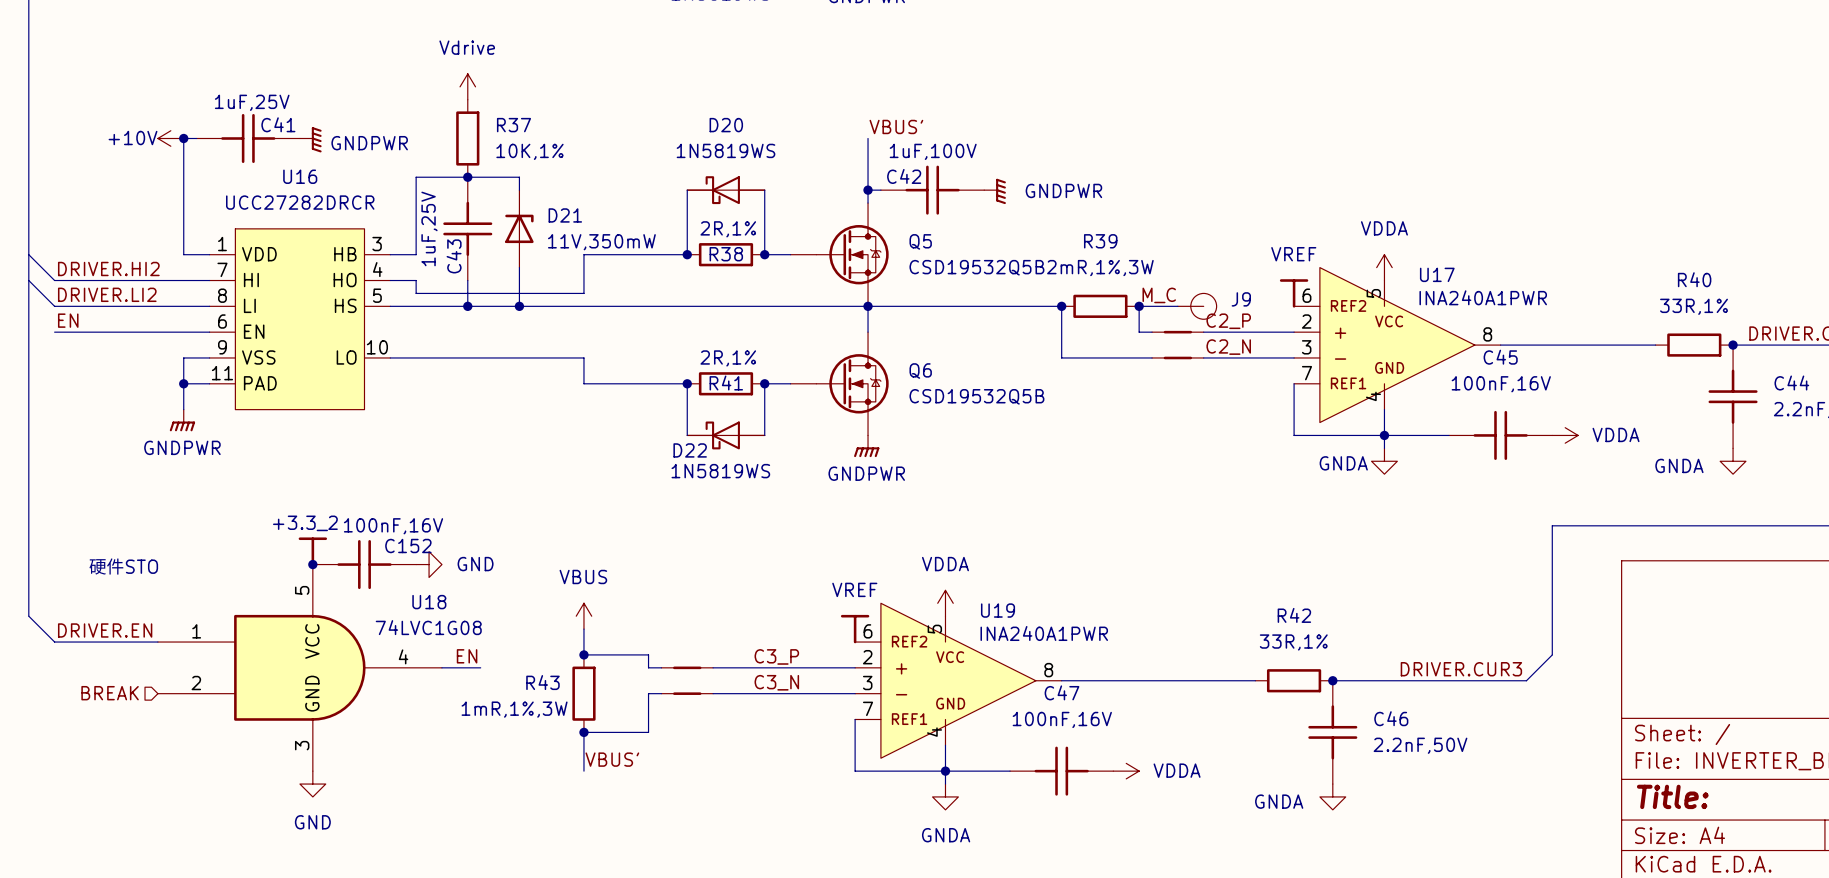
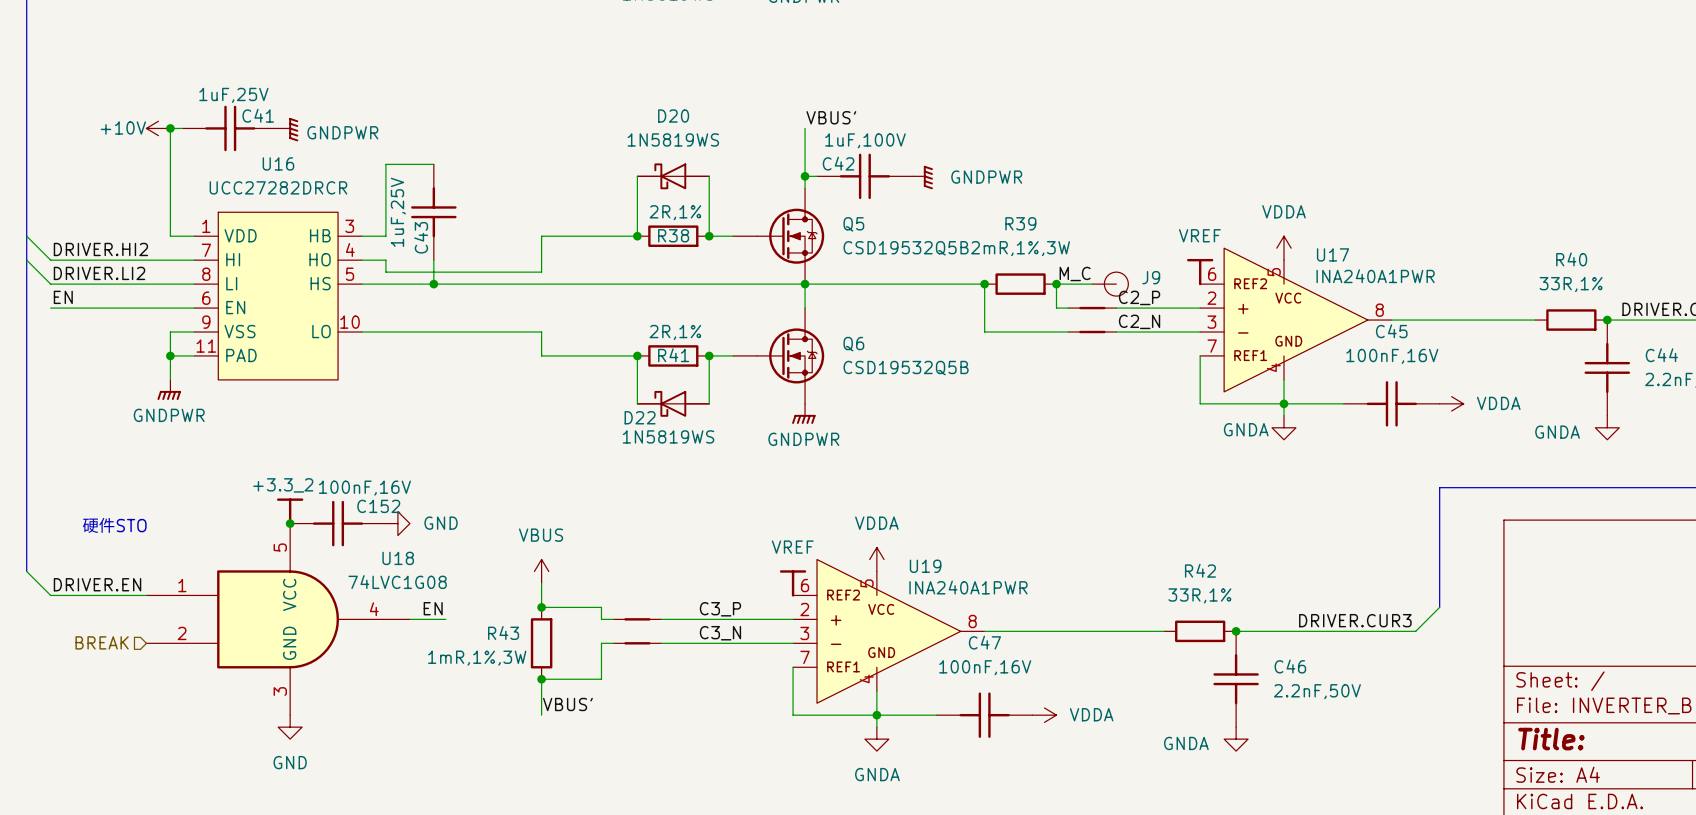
power symbol: Vdrive (467, 86) -> none
R37: 10K,1% (467, 138) -> none
wire: (467, 177) (519, 177) (519, 190) -> none
junction: (467, 177) -> none
D21: 11V,350mW (519, 228) -> none
wire: (519, 267) (519, 306) -> none
junction: (519, 306) -> none

